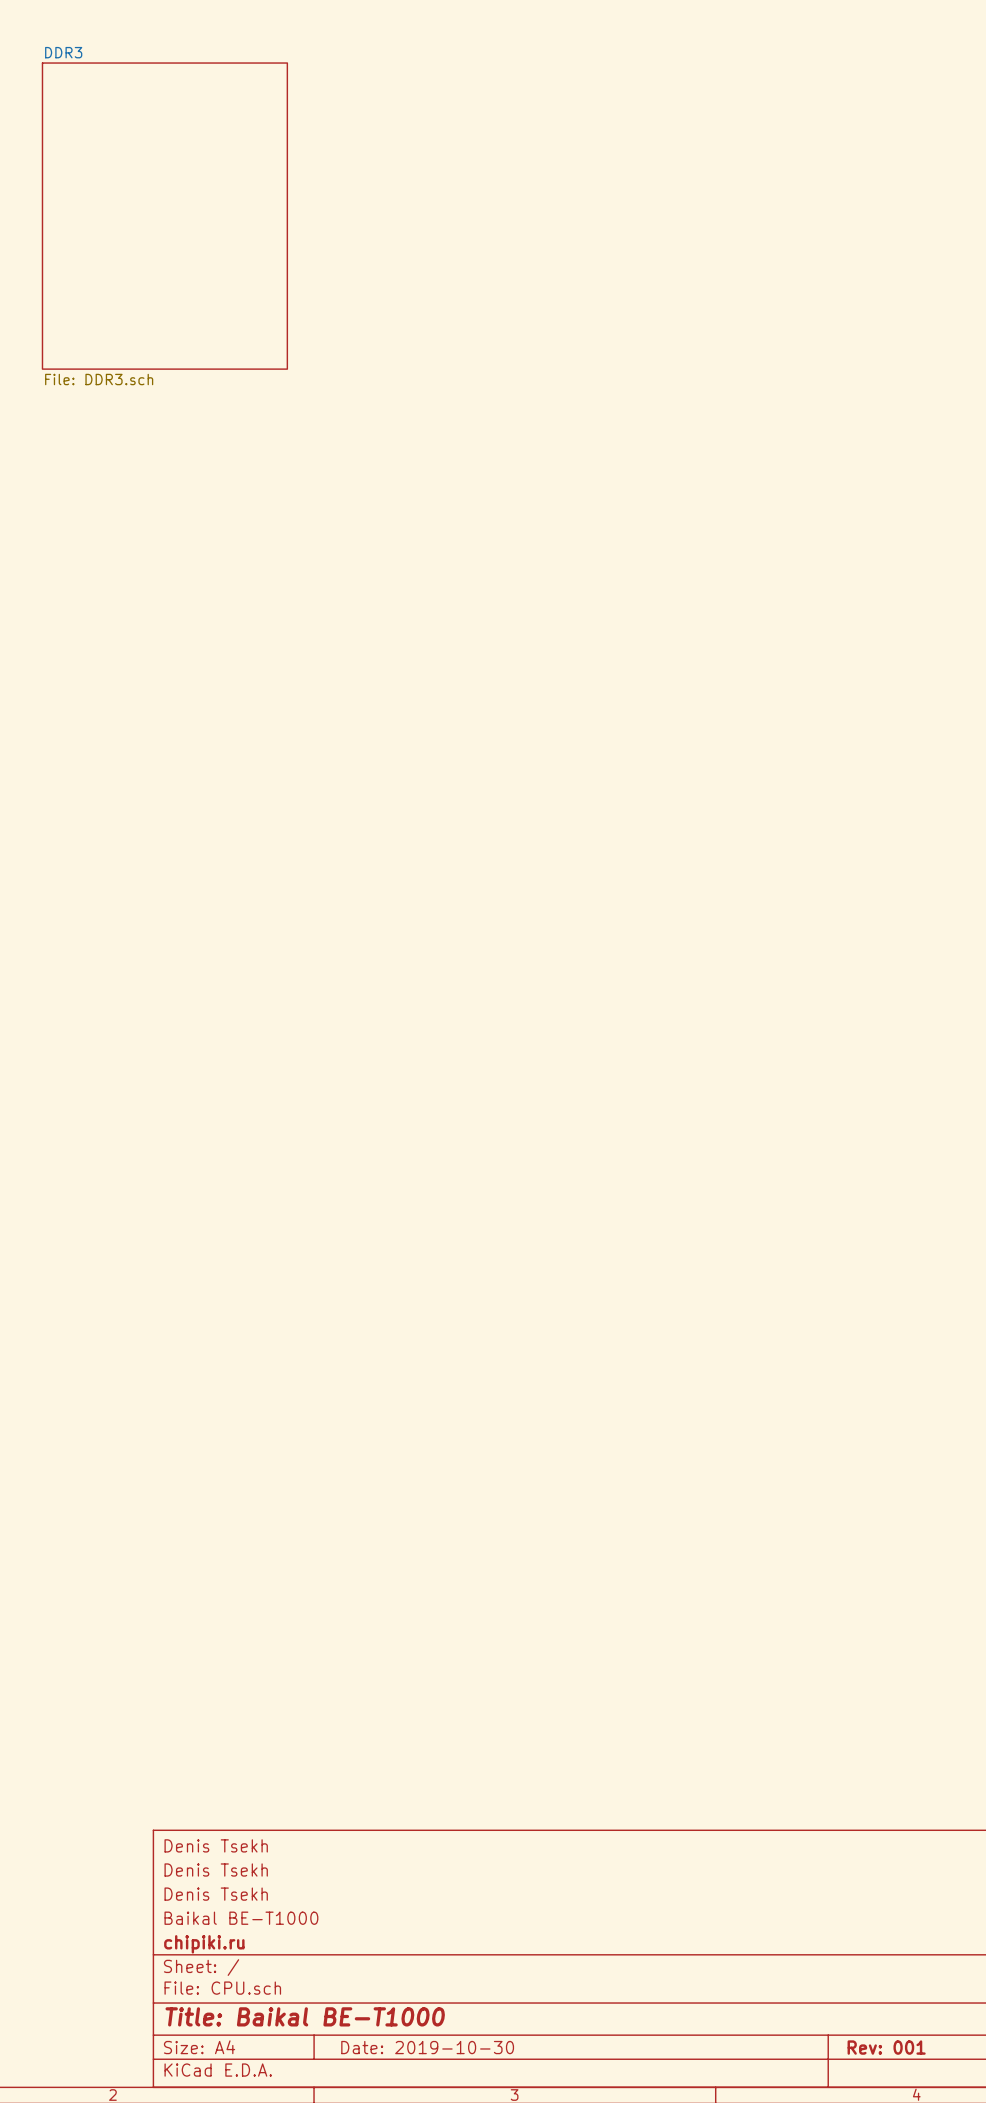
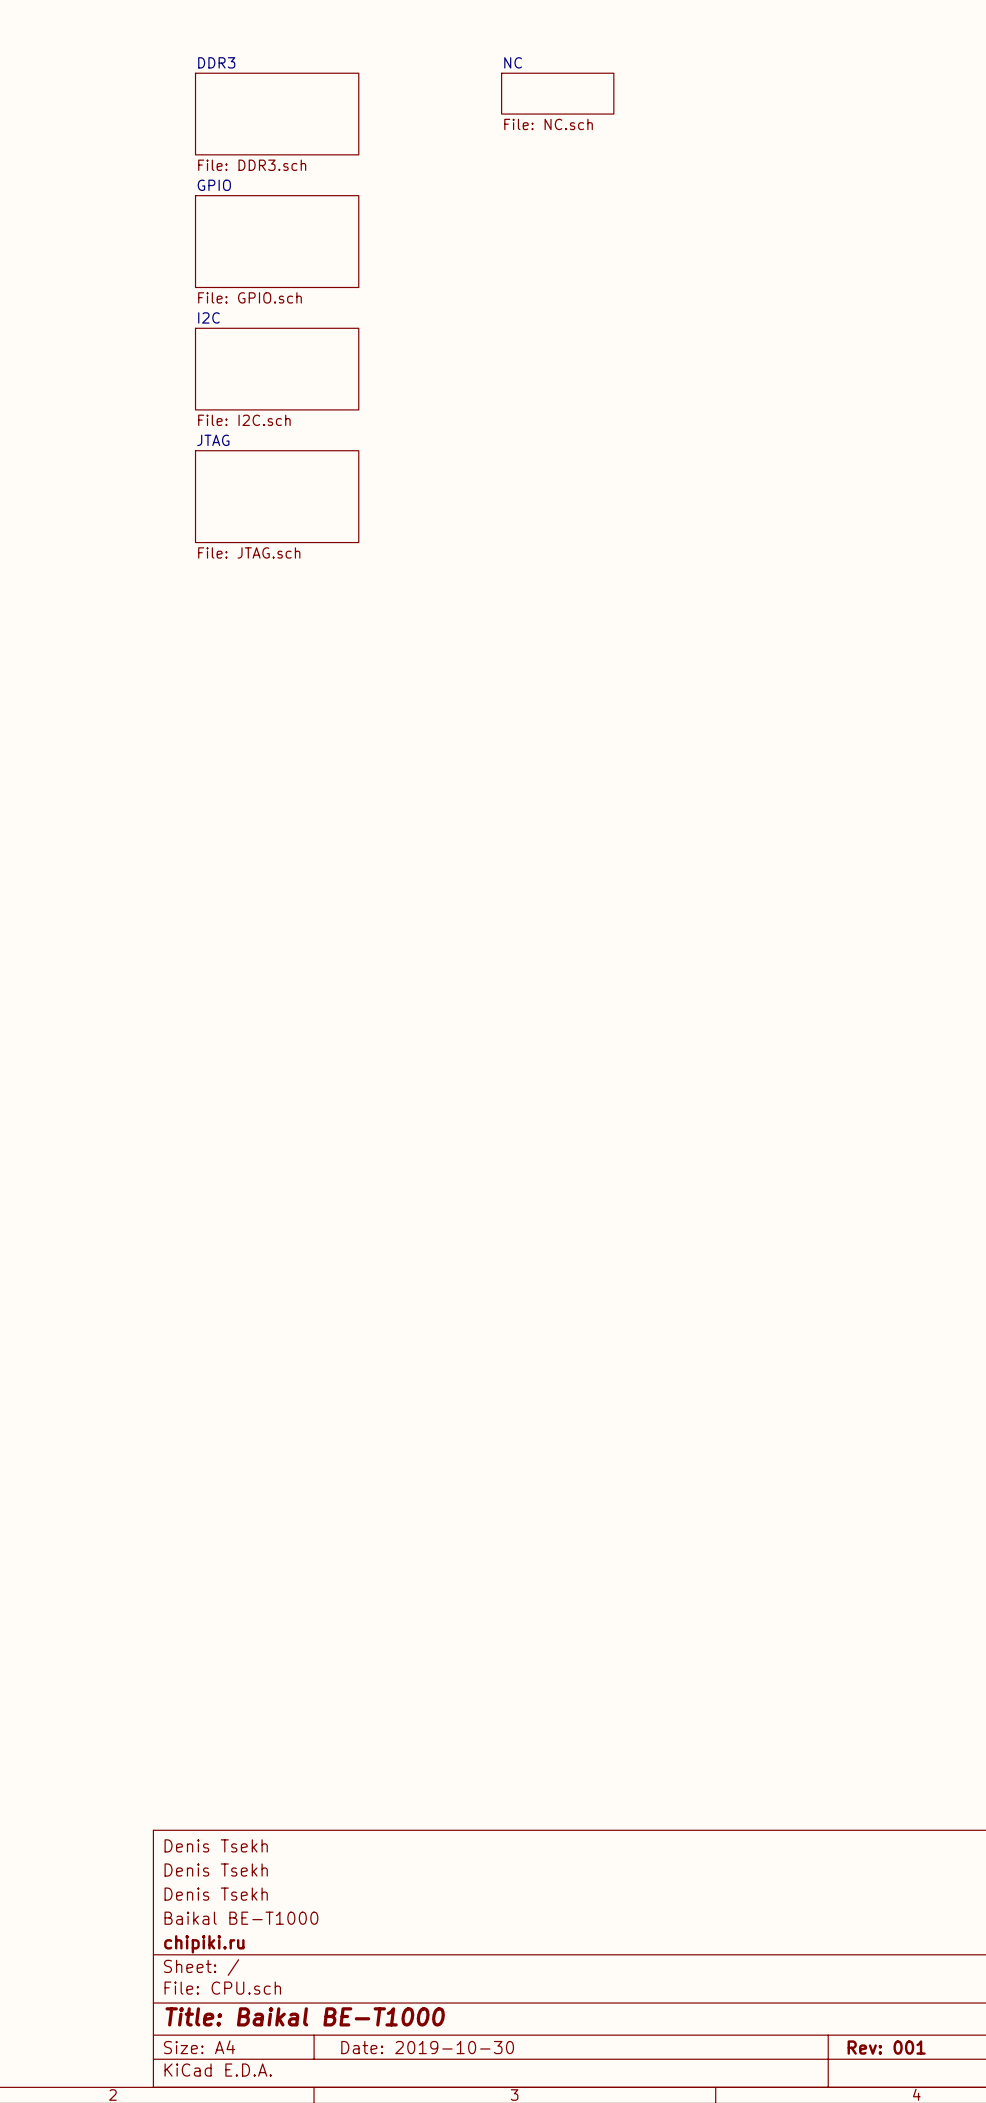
sheet DDR3 name position: DDR3 (63, 52) -> DDR3 (216, 62)
sheet DDR3 shape: [42, 63, 288, 370] -> [195, 73, 359, 155]
sheet NC: none -> File: NC.sch (557, 93)
sheet GPIO: none -> File: GPIO.sch (277, 241)
sheet I2C: none -> File: I2C.sch (277, 369)
sheet DDR3 value position: File: DDR3.sch (99, 379) -> File: DDR3.sch (252, 165)
sheet JTAG: none -> File: JTAG.sch (277, 496)

